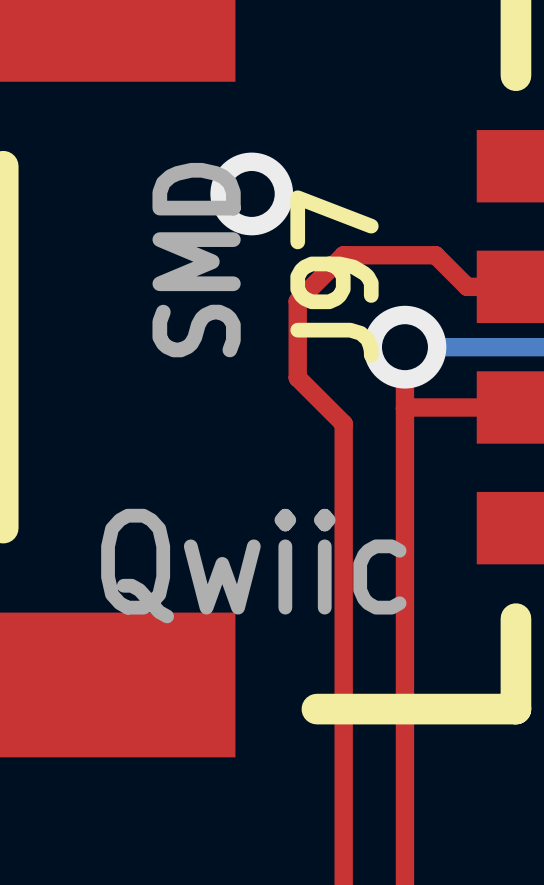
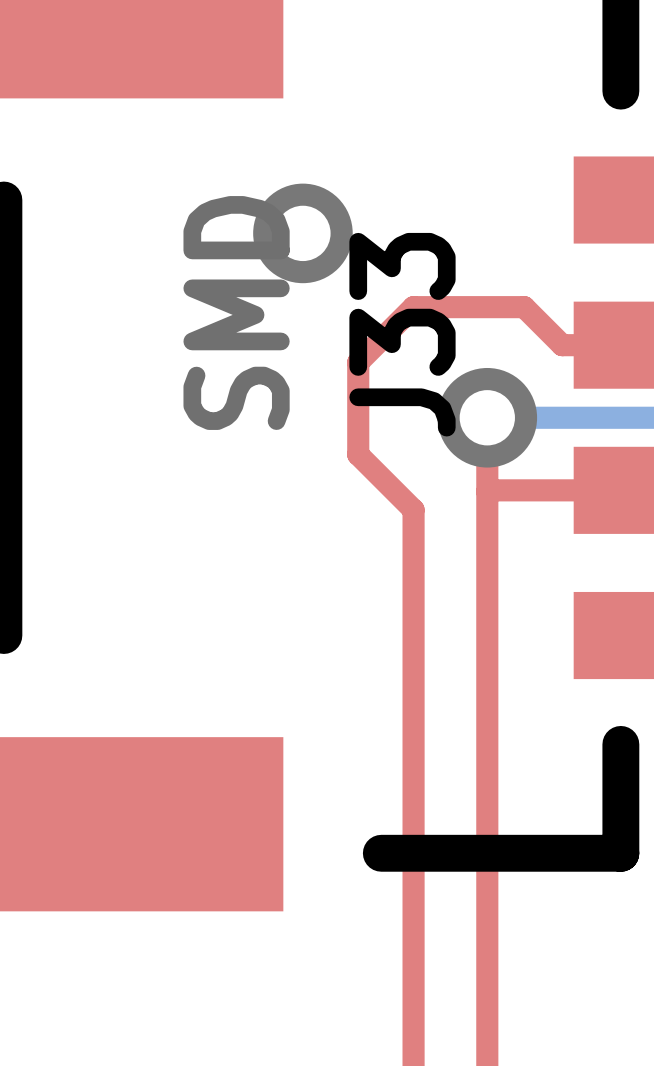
J97 name: J97 (334, 276) -> J33 (402, 334)
text: Qwiic (253, 566) -> none

